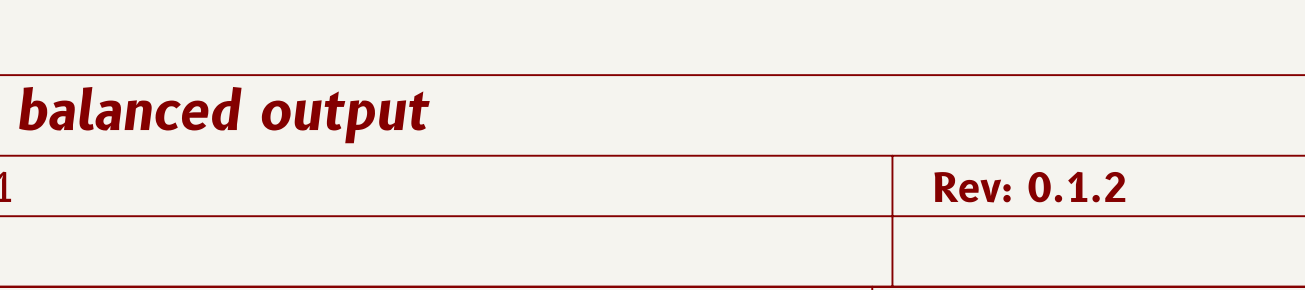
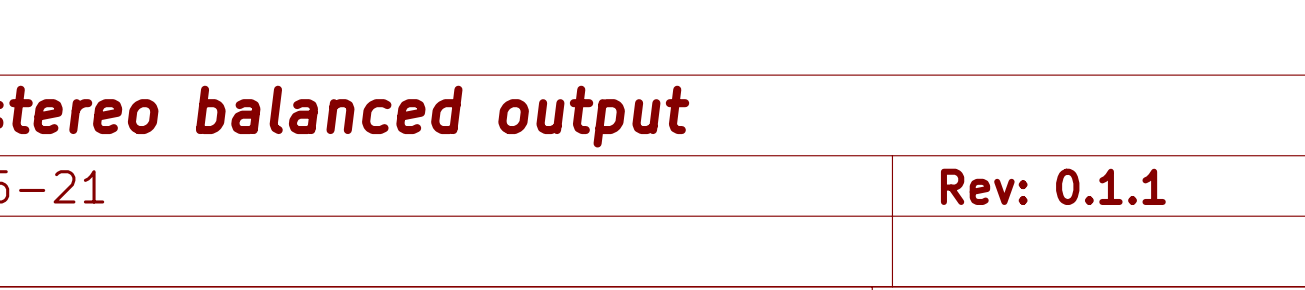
title block: Rev: 0.1.2 (1029, 187) -> Rev: 0.1.1 (1053, 186)

